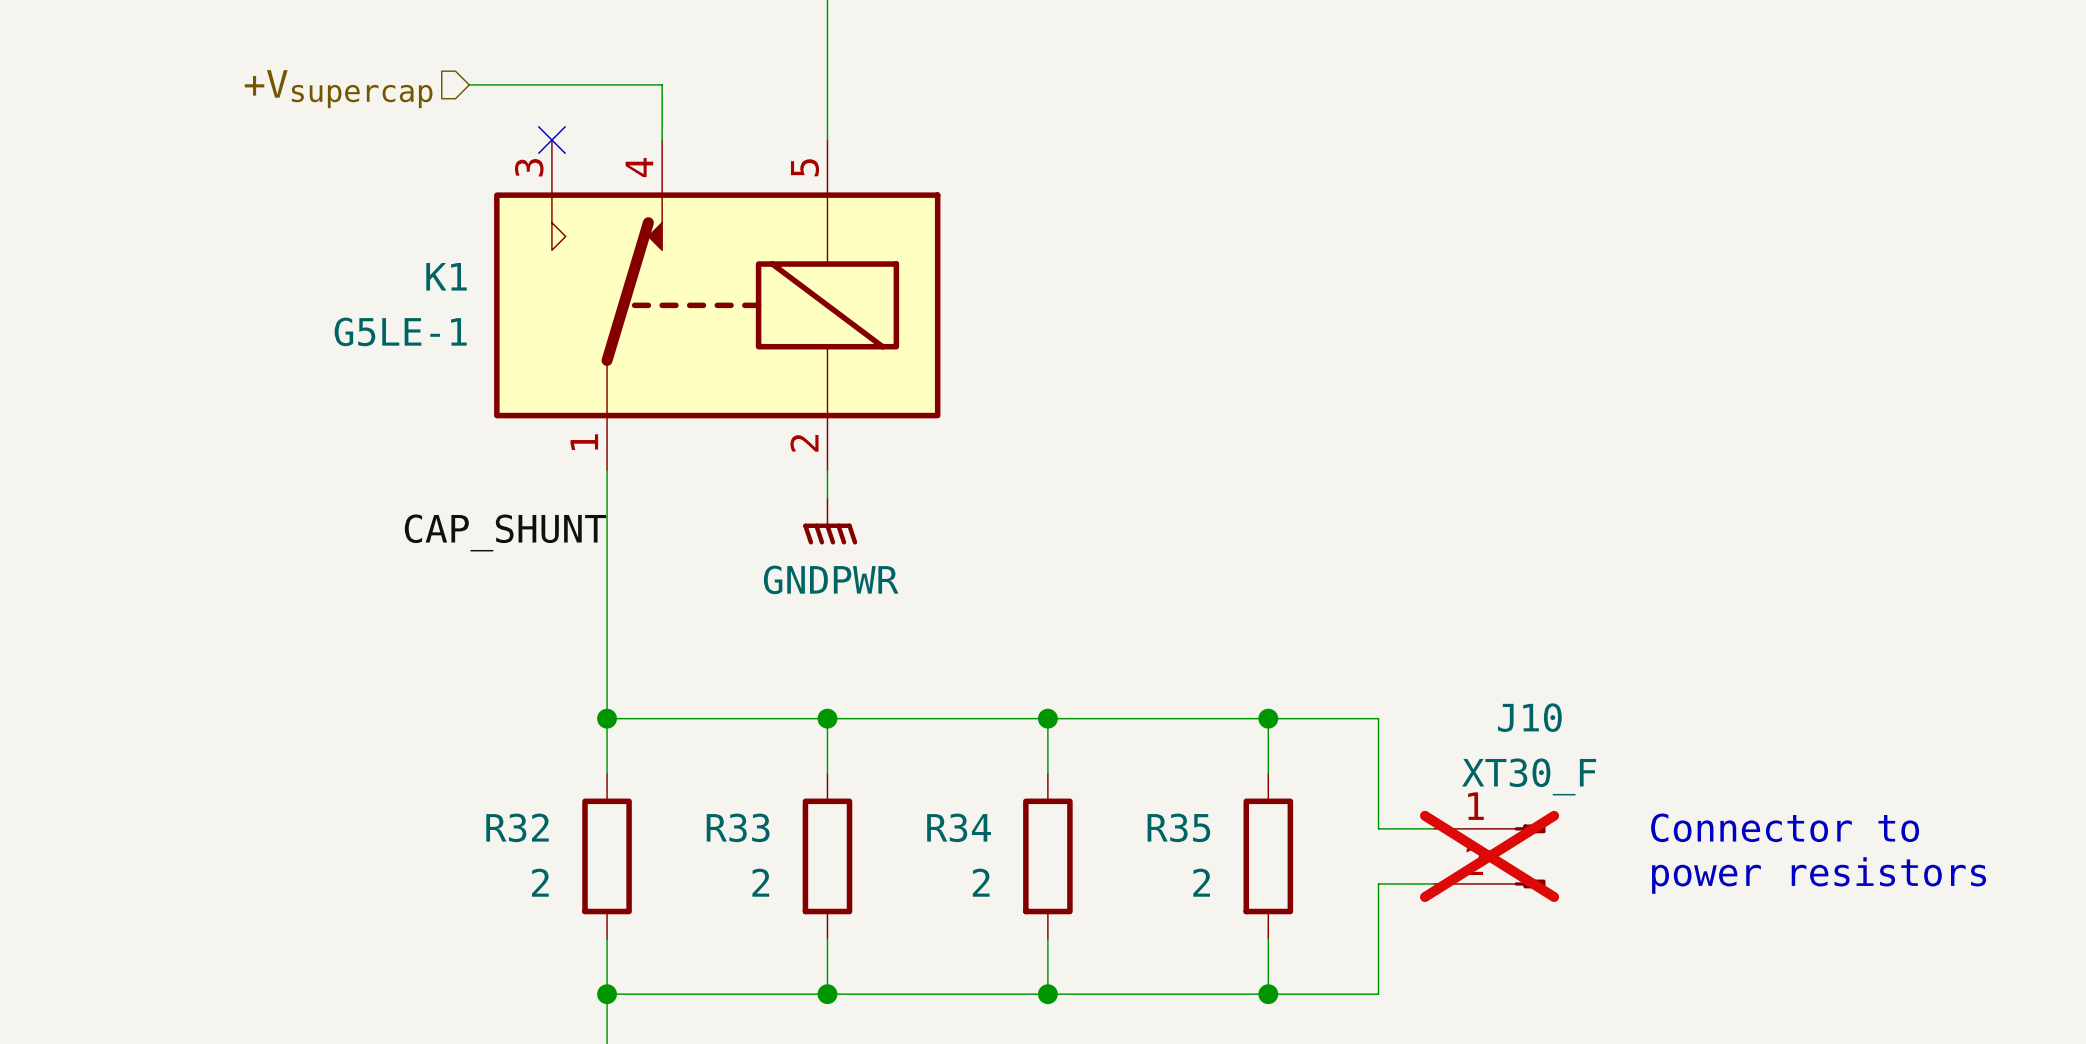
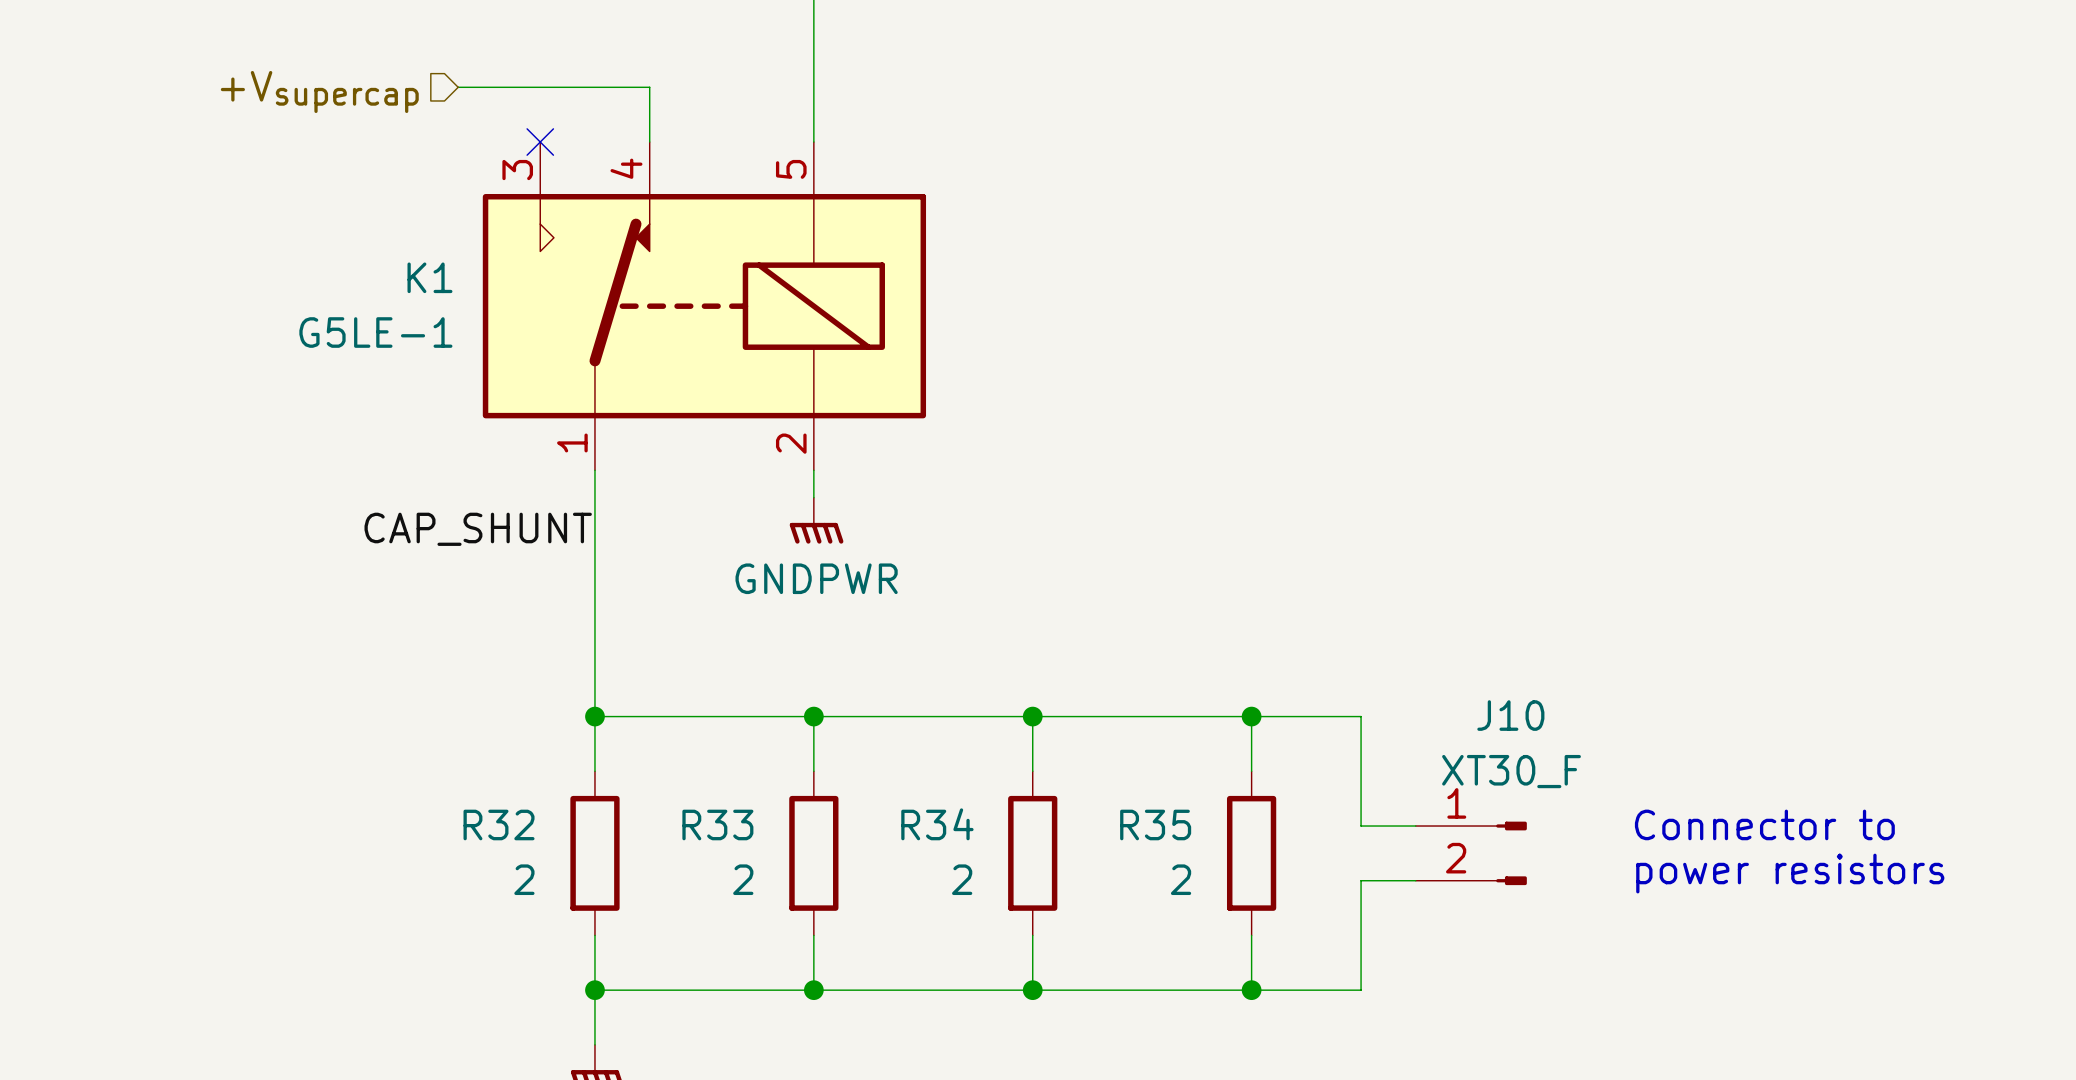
J10 do-not-place cross: (1489, 856) -> none

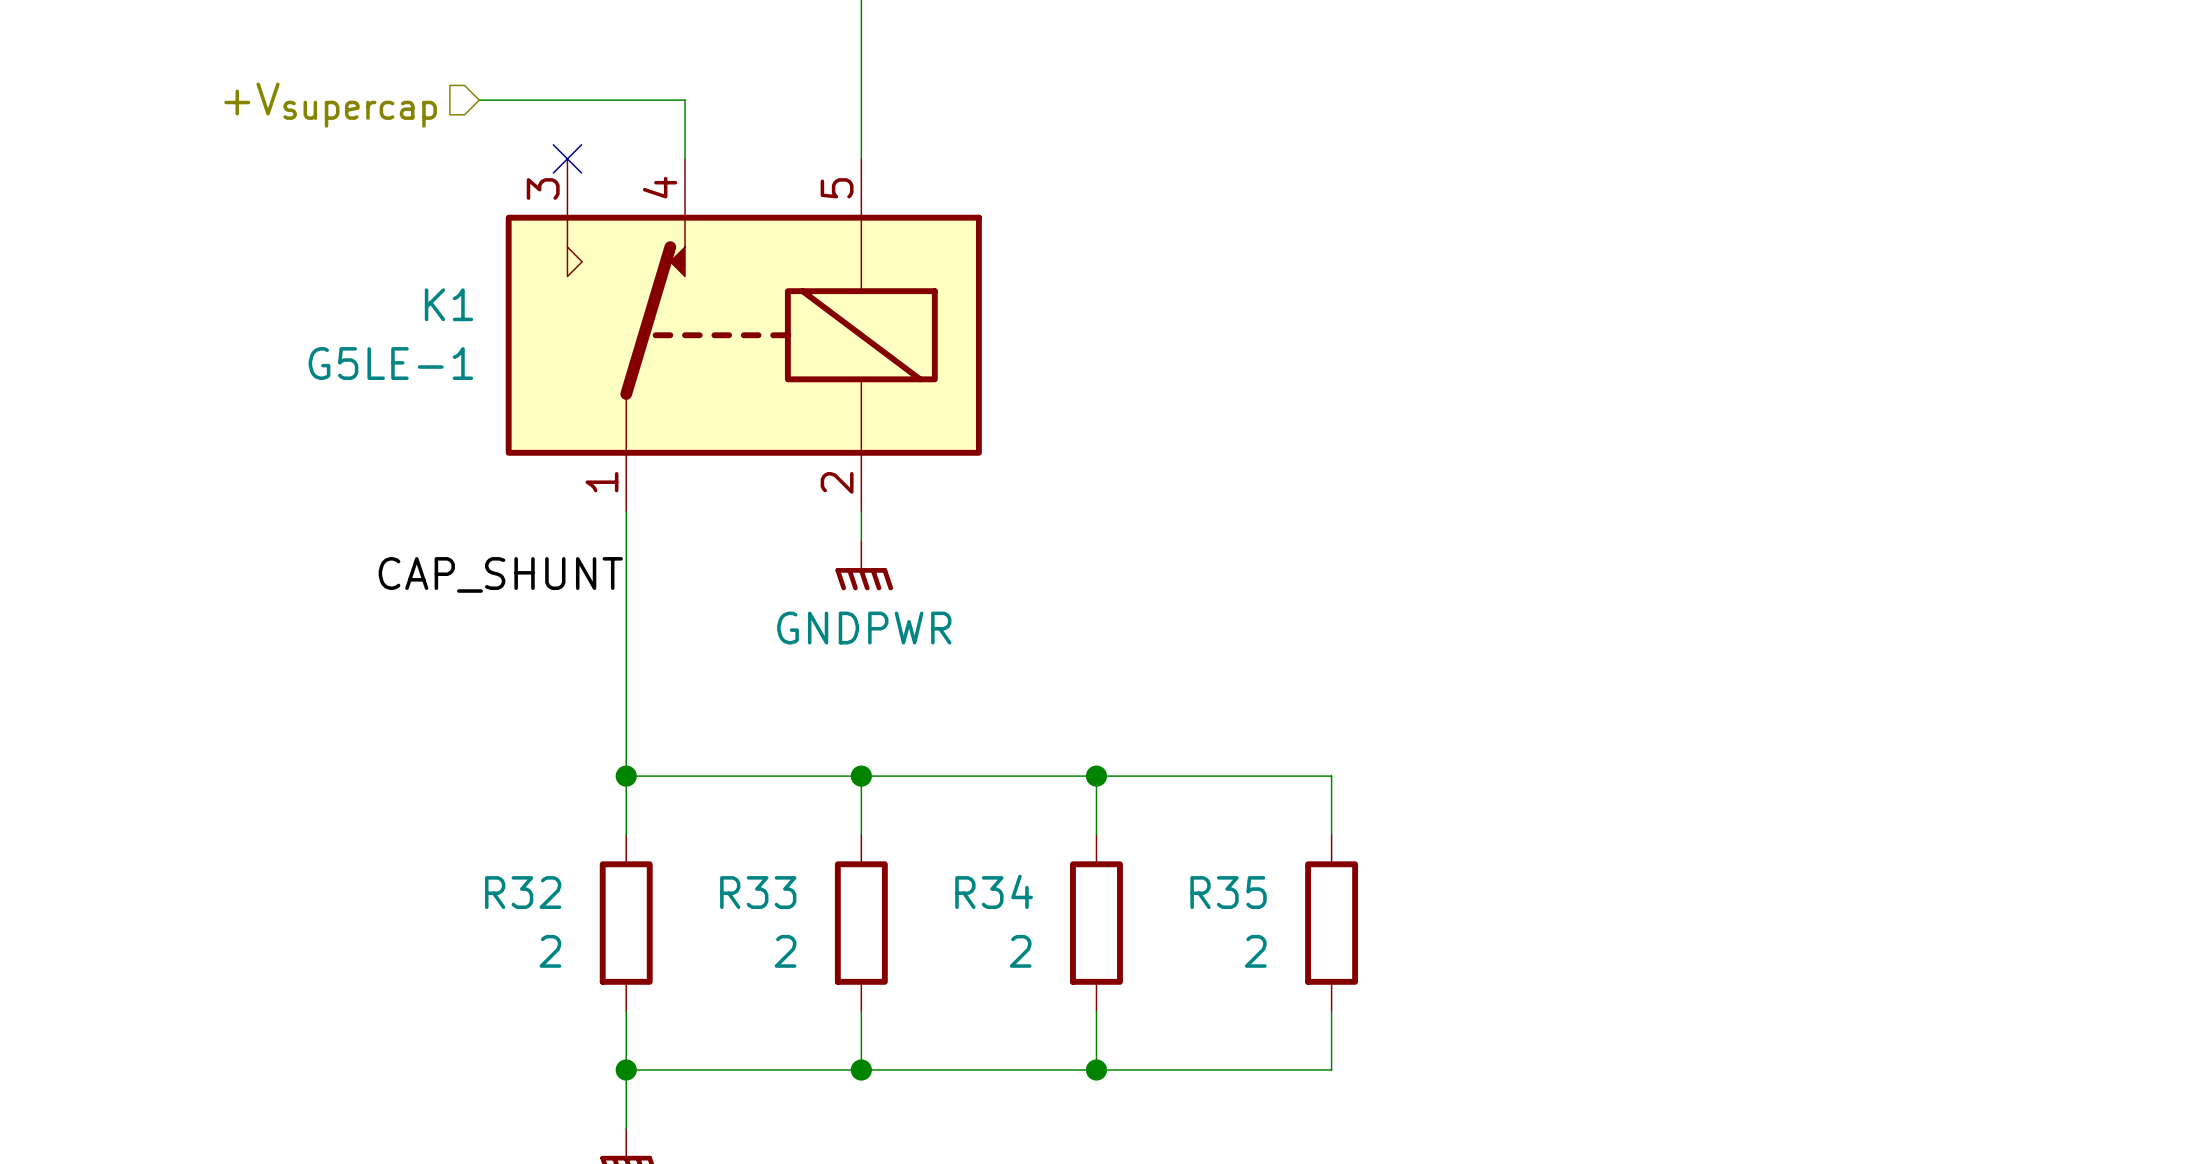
wire: (1251, 716) (1361, 716) (1361, 826) (1415, 826) -> none
junction: (1251, 716) -> none
text: Connector to (1764, 824) -> none
J10: XT30_F (1471, 853) -> none
text: power resistors (1790, 873) -> none
wire: (1415, 880) (1361, 880) (1361, 990) (1251, 990) -> none
junction: (1251, 990) -> none

